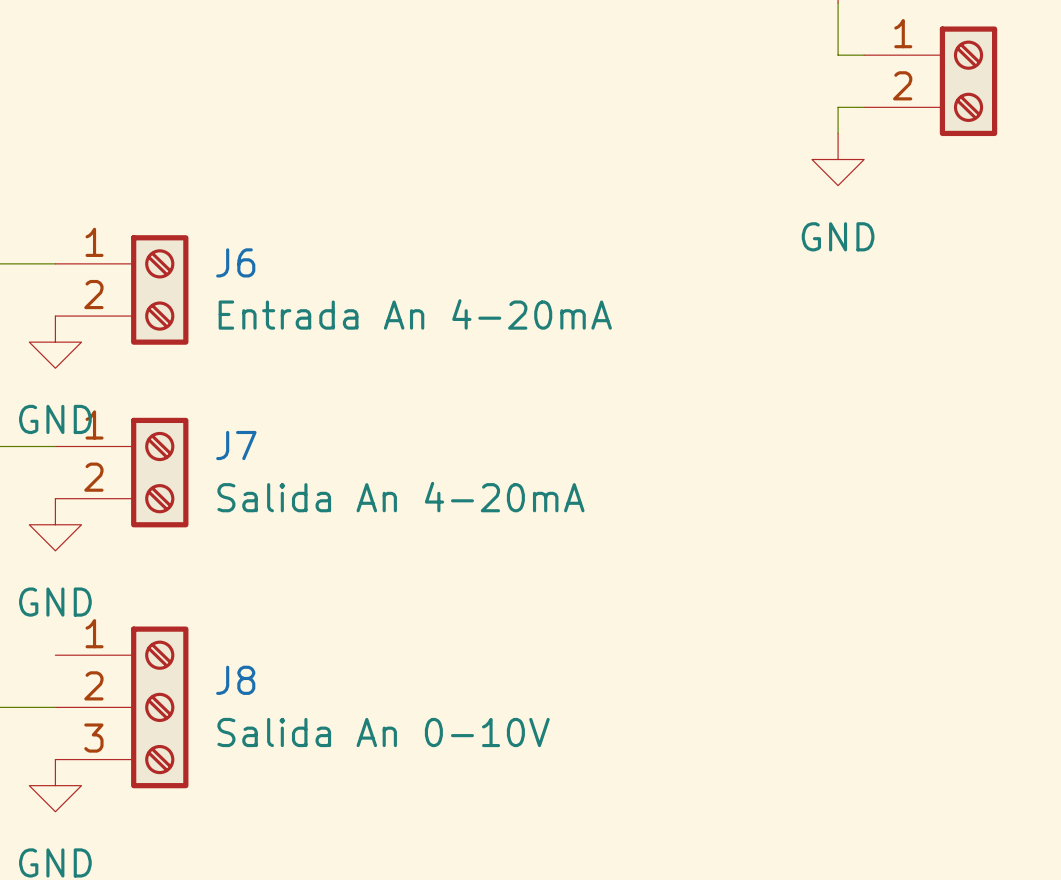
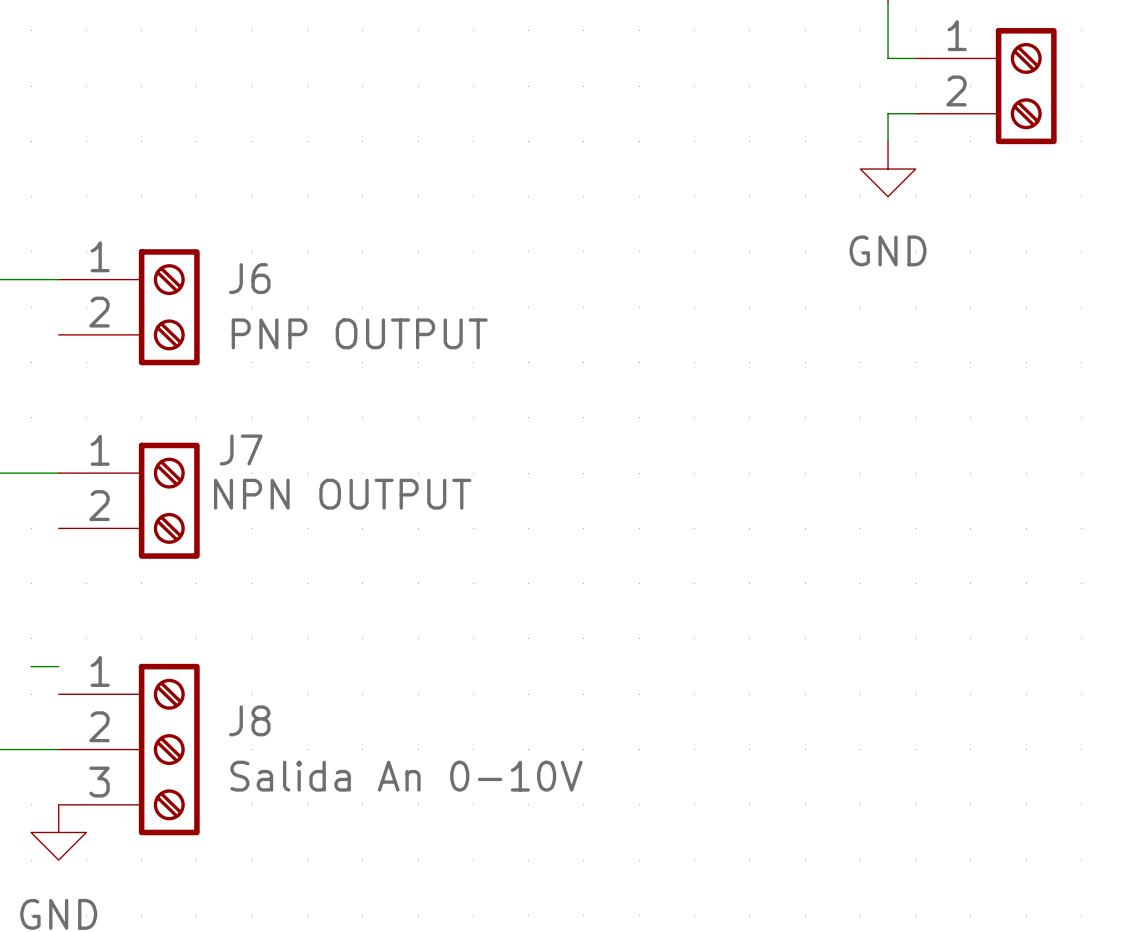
J6 value: Entrada An 4-20mA (415, 314) -> PNP OUTPUT (359, 333)
power symbol: GND (55, 342) -> none
J7 name position: J7 (236, 445) -> J7 (241, 449)
J7 value: Salida An 4-20mA (400, 497) -> NPN OUTPUT (342, 494)
power symbol: GND (55, 524) -> none
wire: none -> (31, 666) (58, 666)

